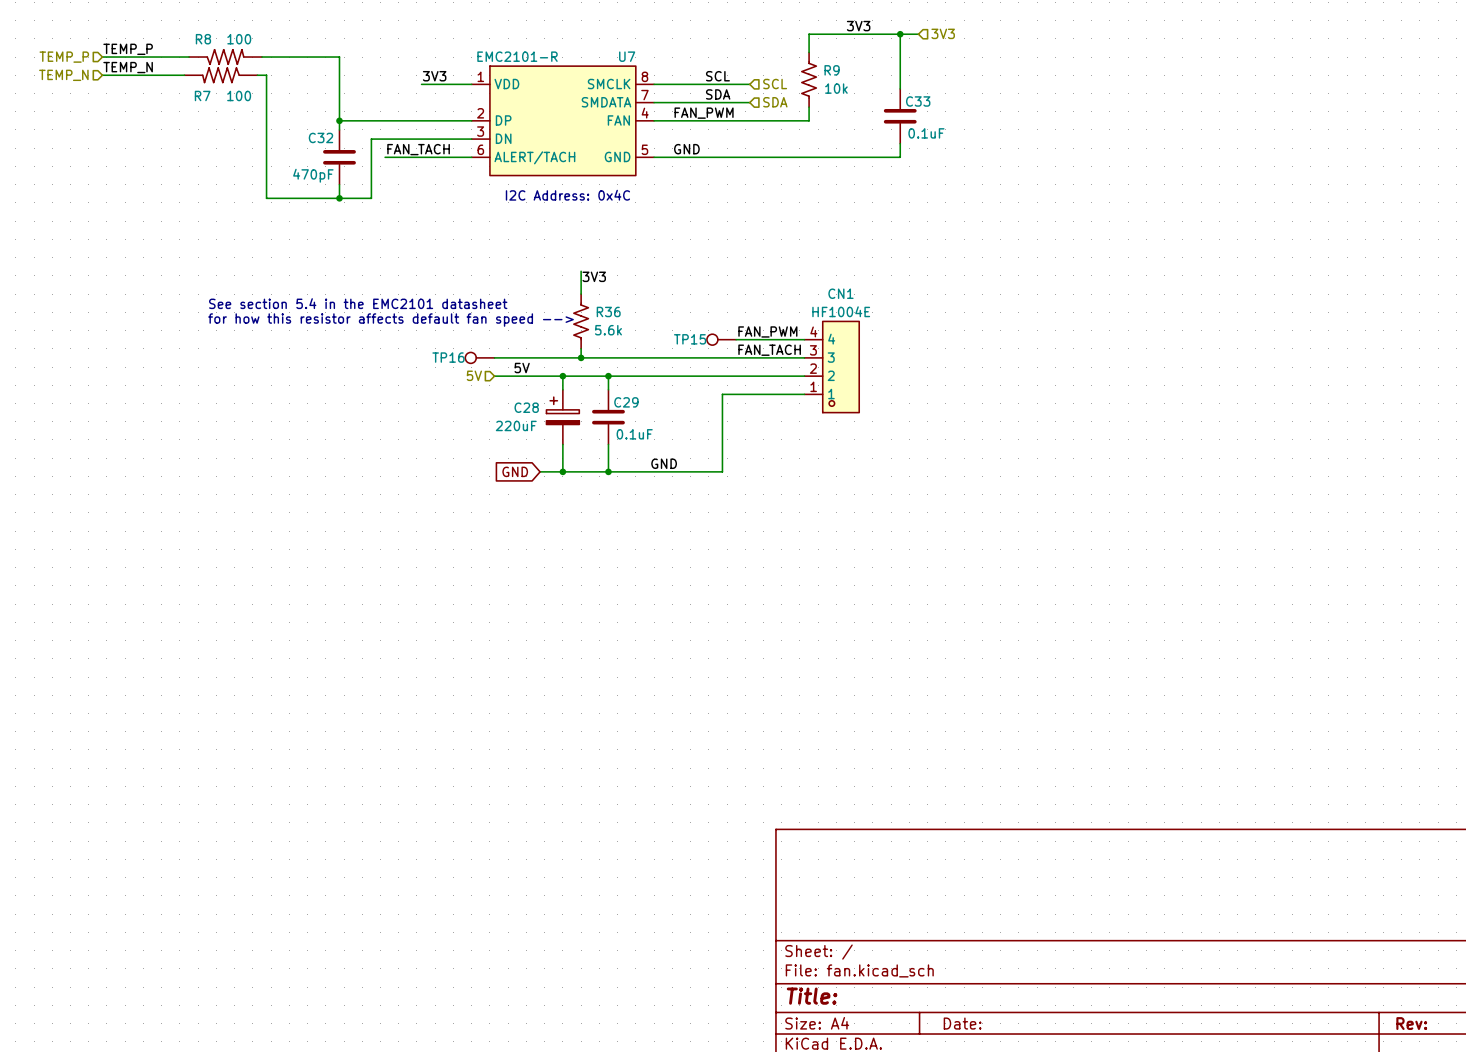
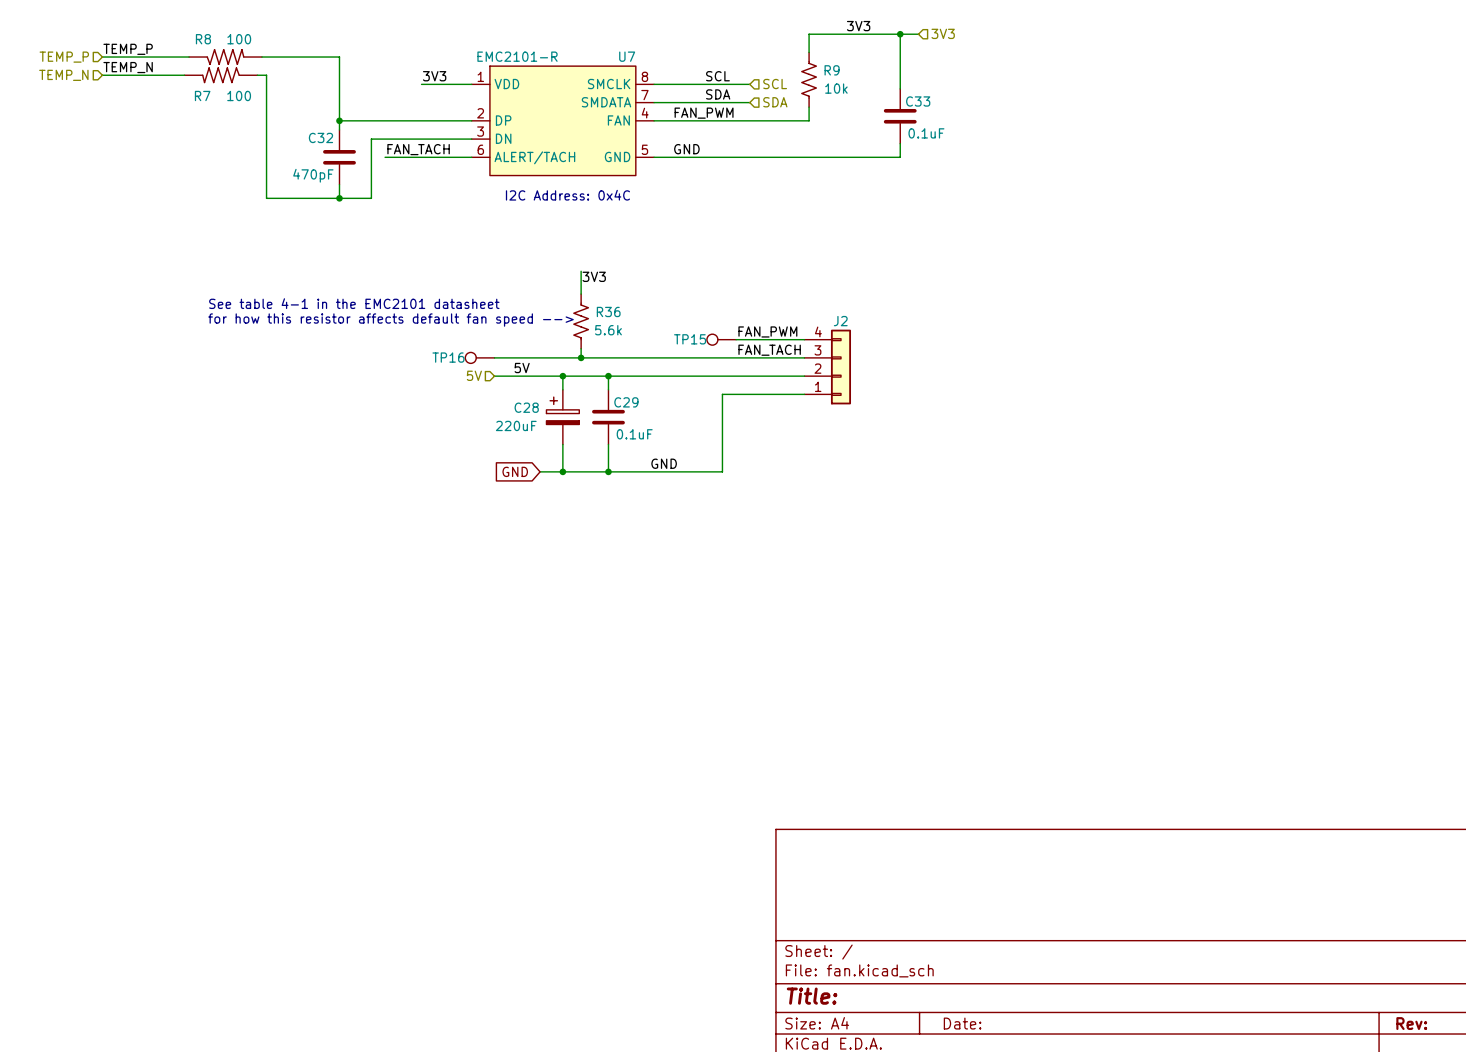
text: See section 5.4 in the EMC2101 datasheet (358, 303) -> See table 4-1 in the EMC2101 datasheet (354, 303)
J2: none -> (827, 367)
CN1: HF1004E (831, 367) -> none

